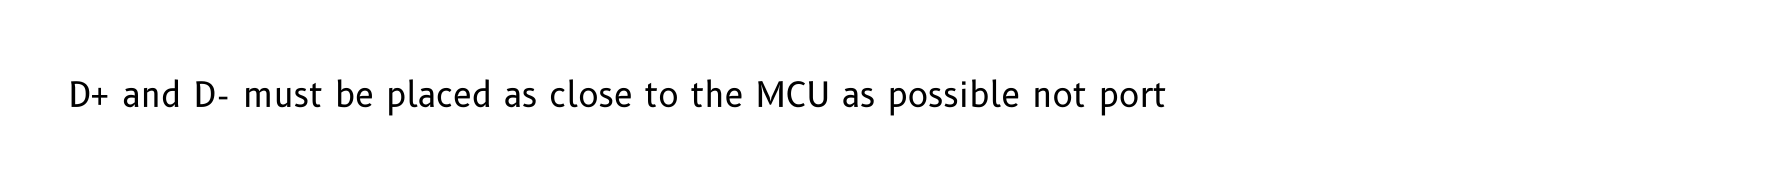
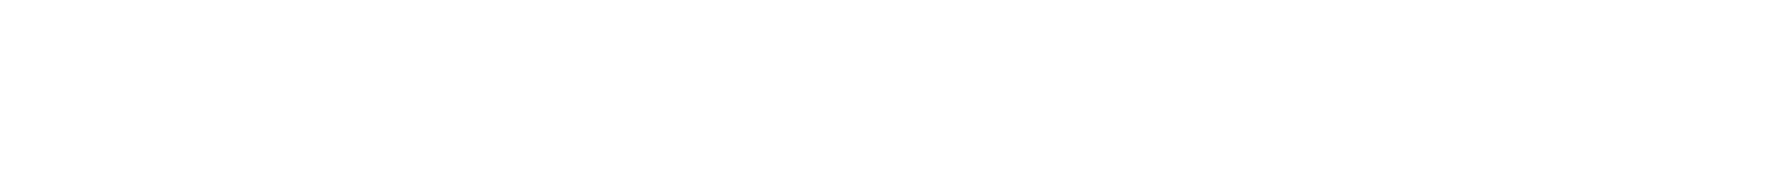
label: D+ and D- must be placed as close to the MCU as possible not port (618, 97) -> none

